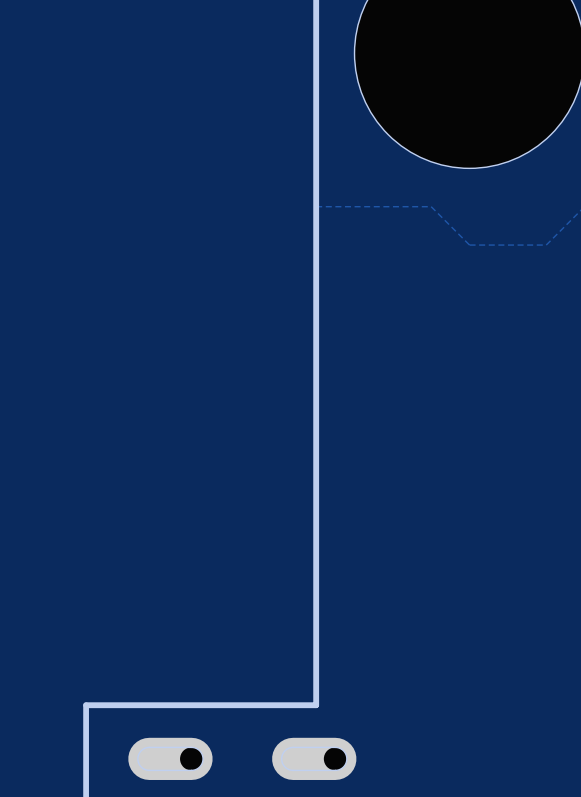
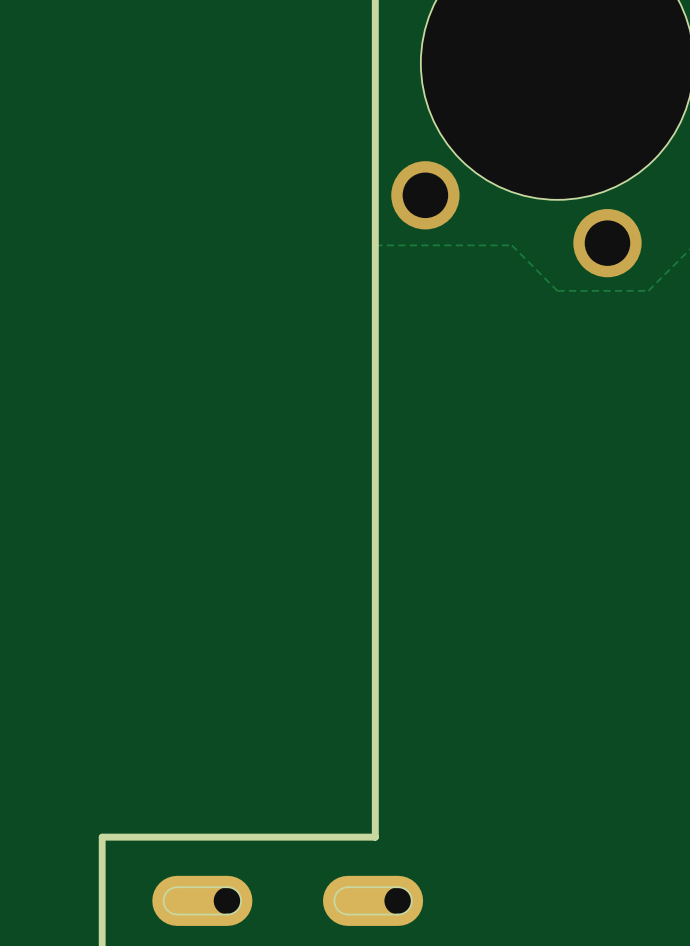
via: none -> (425, 195)
via: none -> (607, 243)

